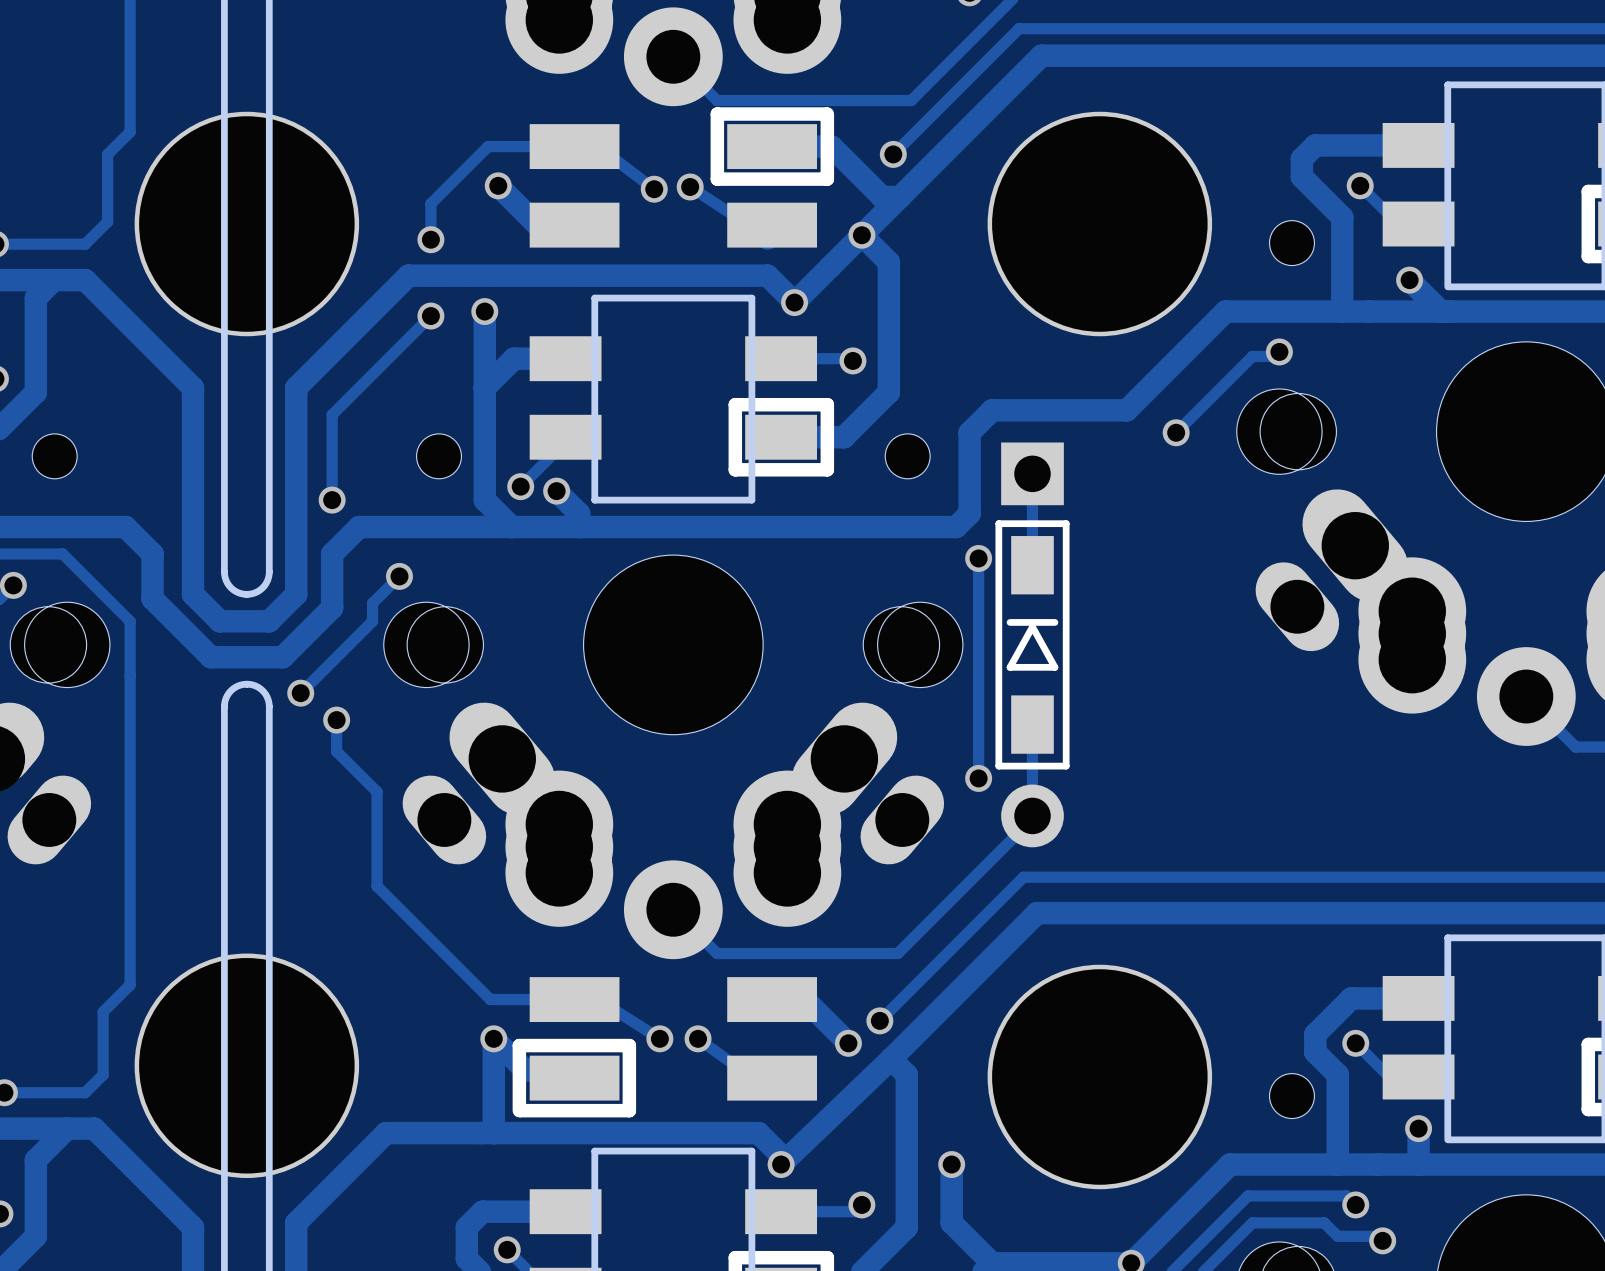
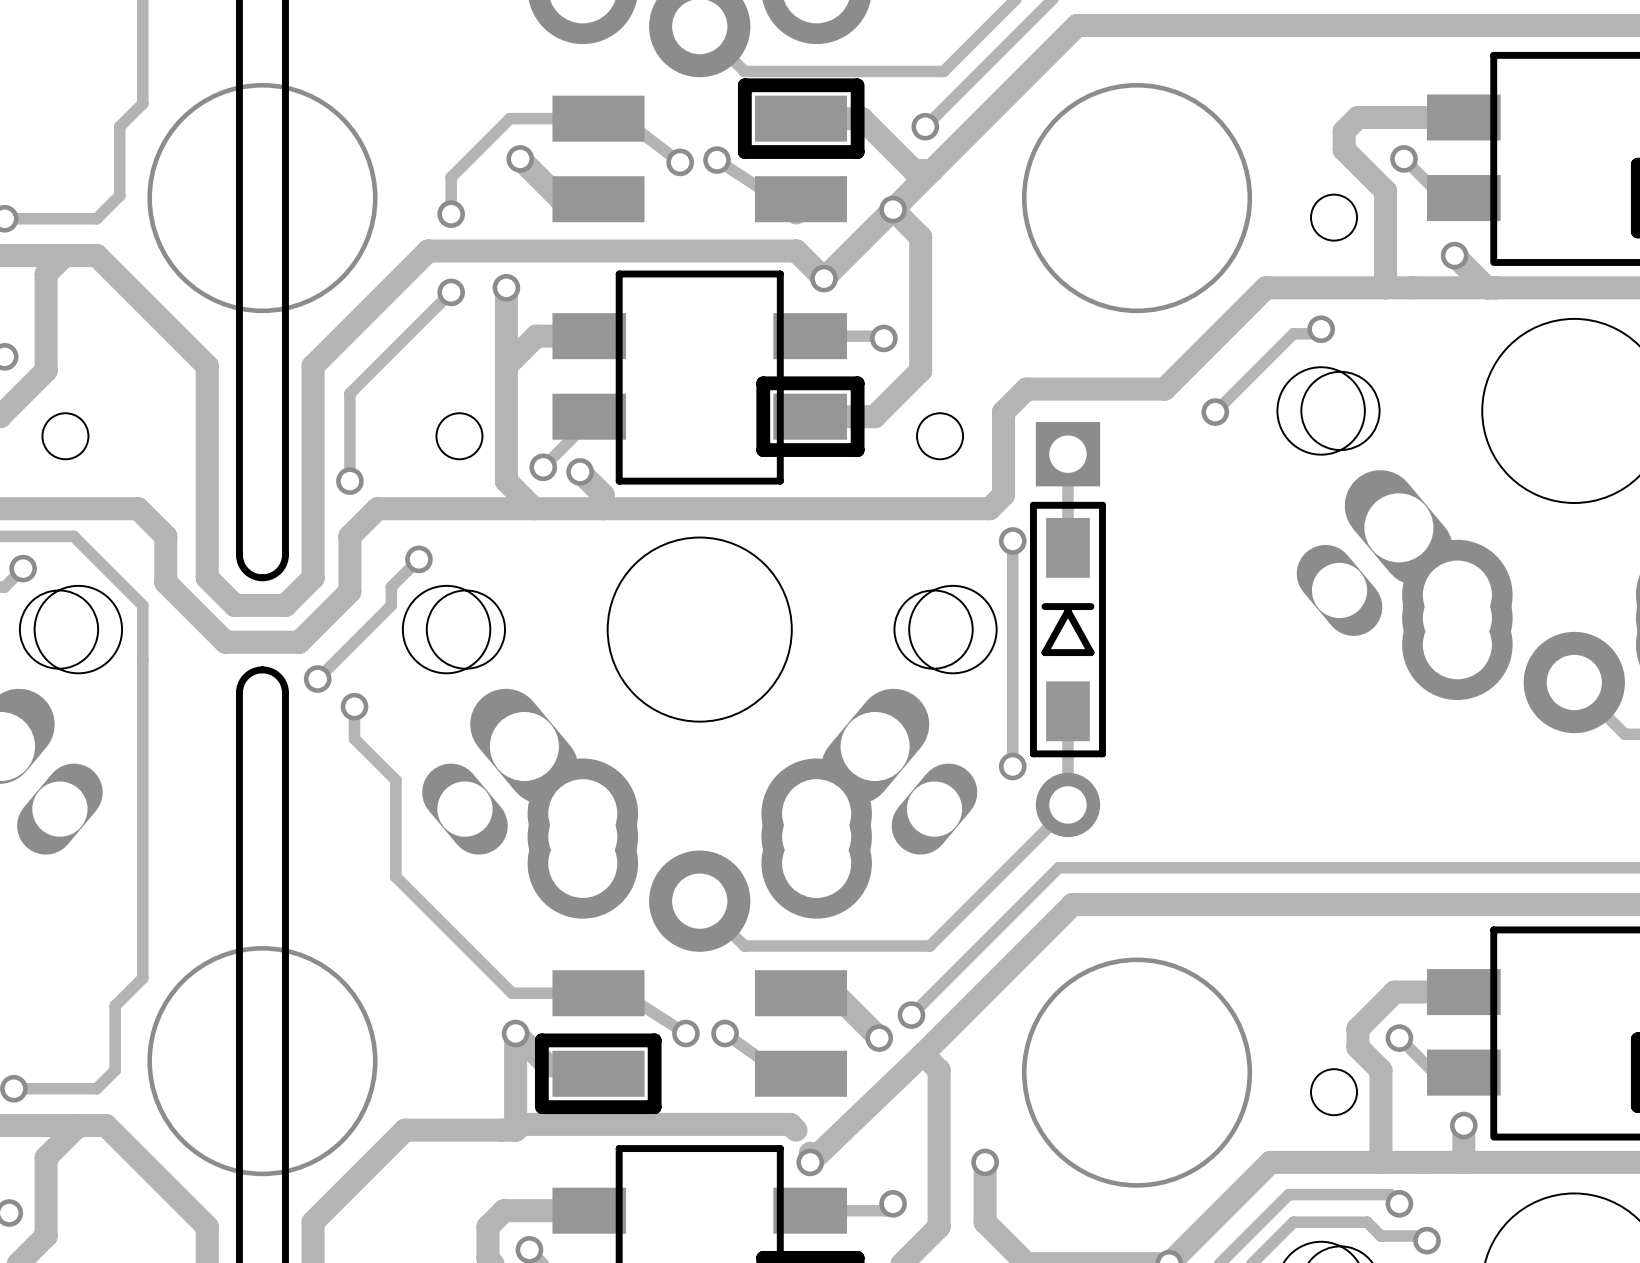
track: (493, 1133) (758, 1133) (781, 1155) -> (515, 1130) (521, 1124) (790, 1124) (796, 1130)

